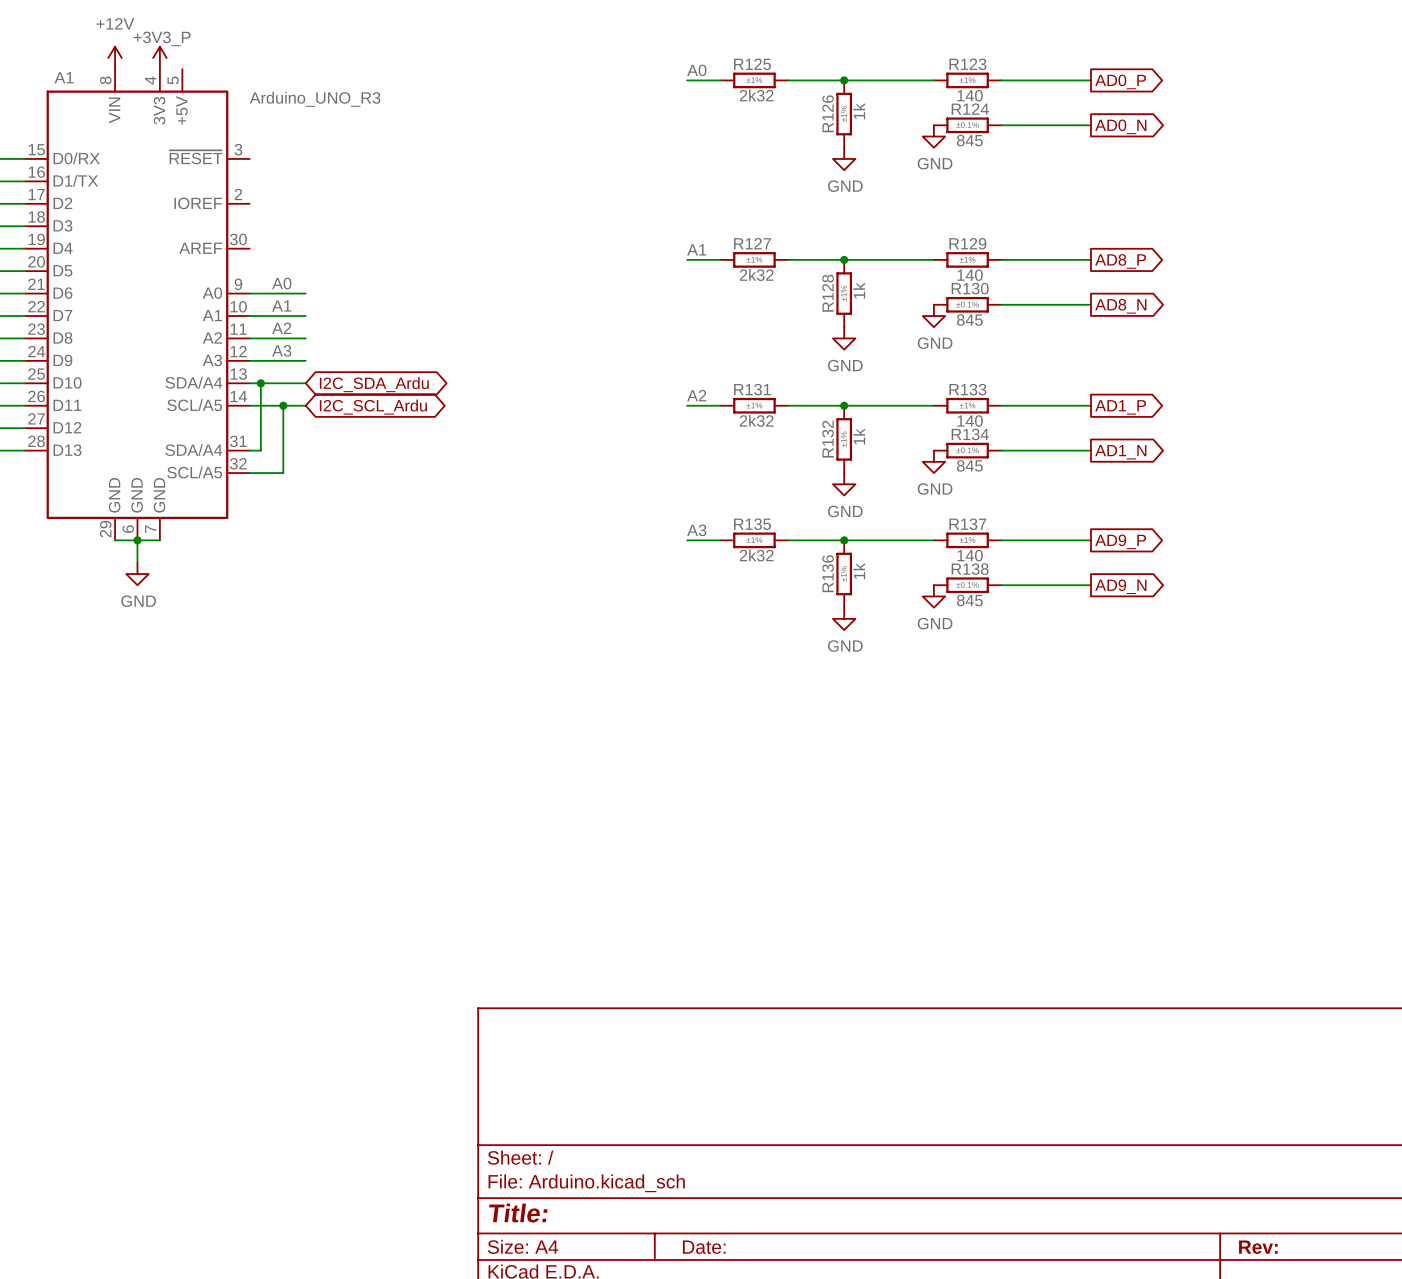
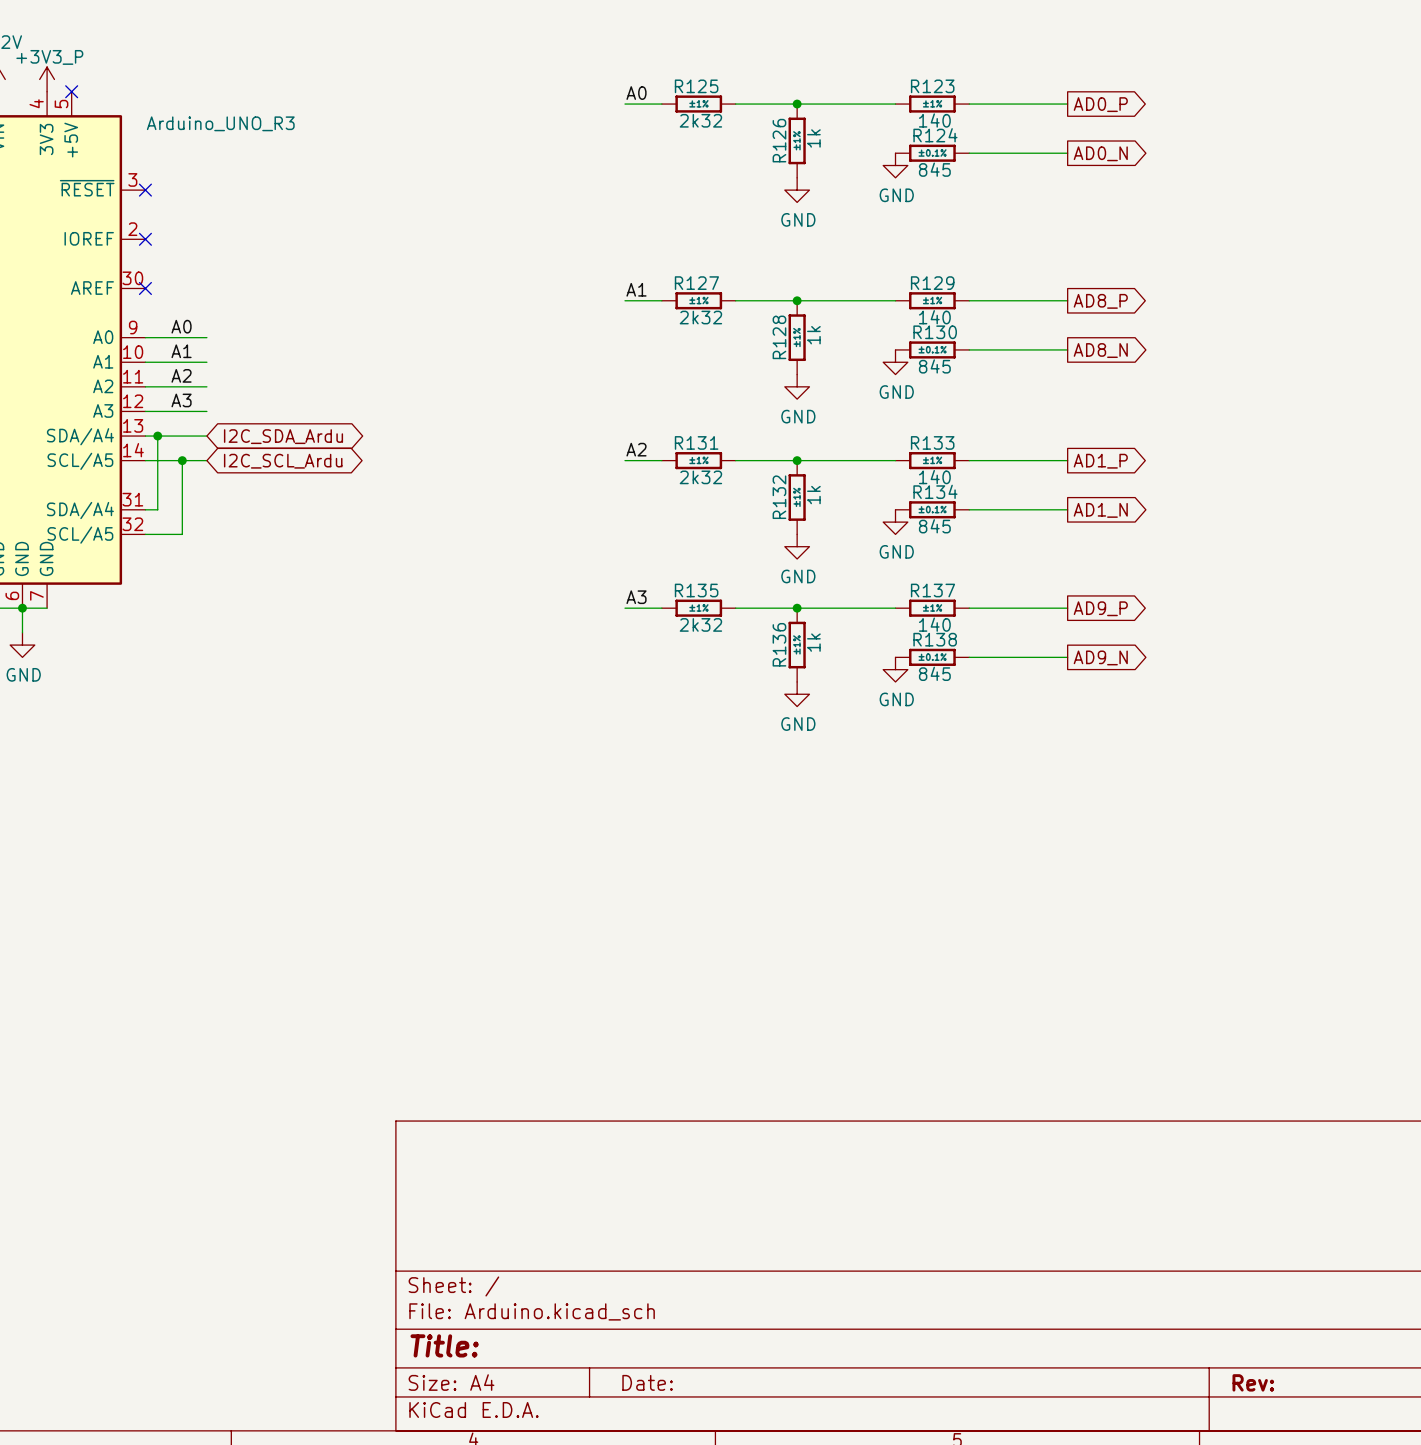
no-connect mark: none -> (71, 91)
no-connect mark: none -> (145, 190)
no-connect mark: none -> (145, 239)
no-connect mark: none -> (145, 288)

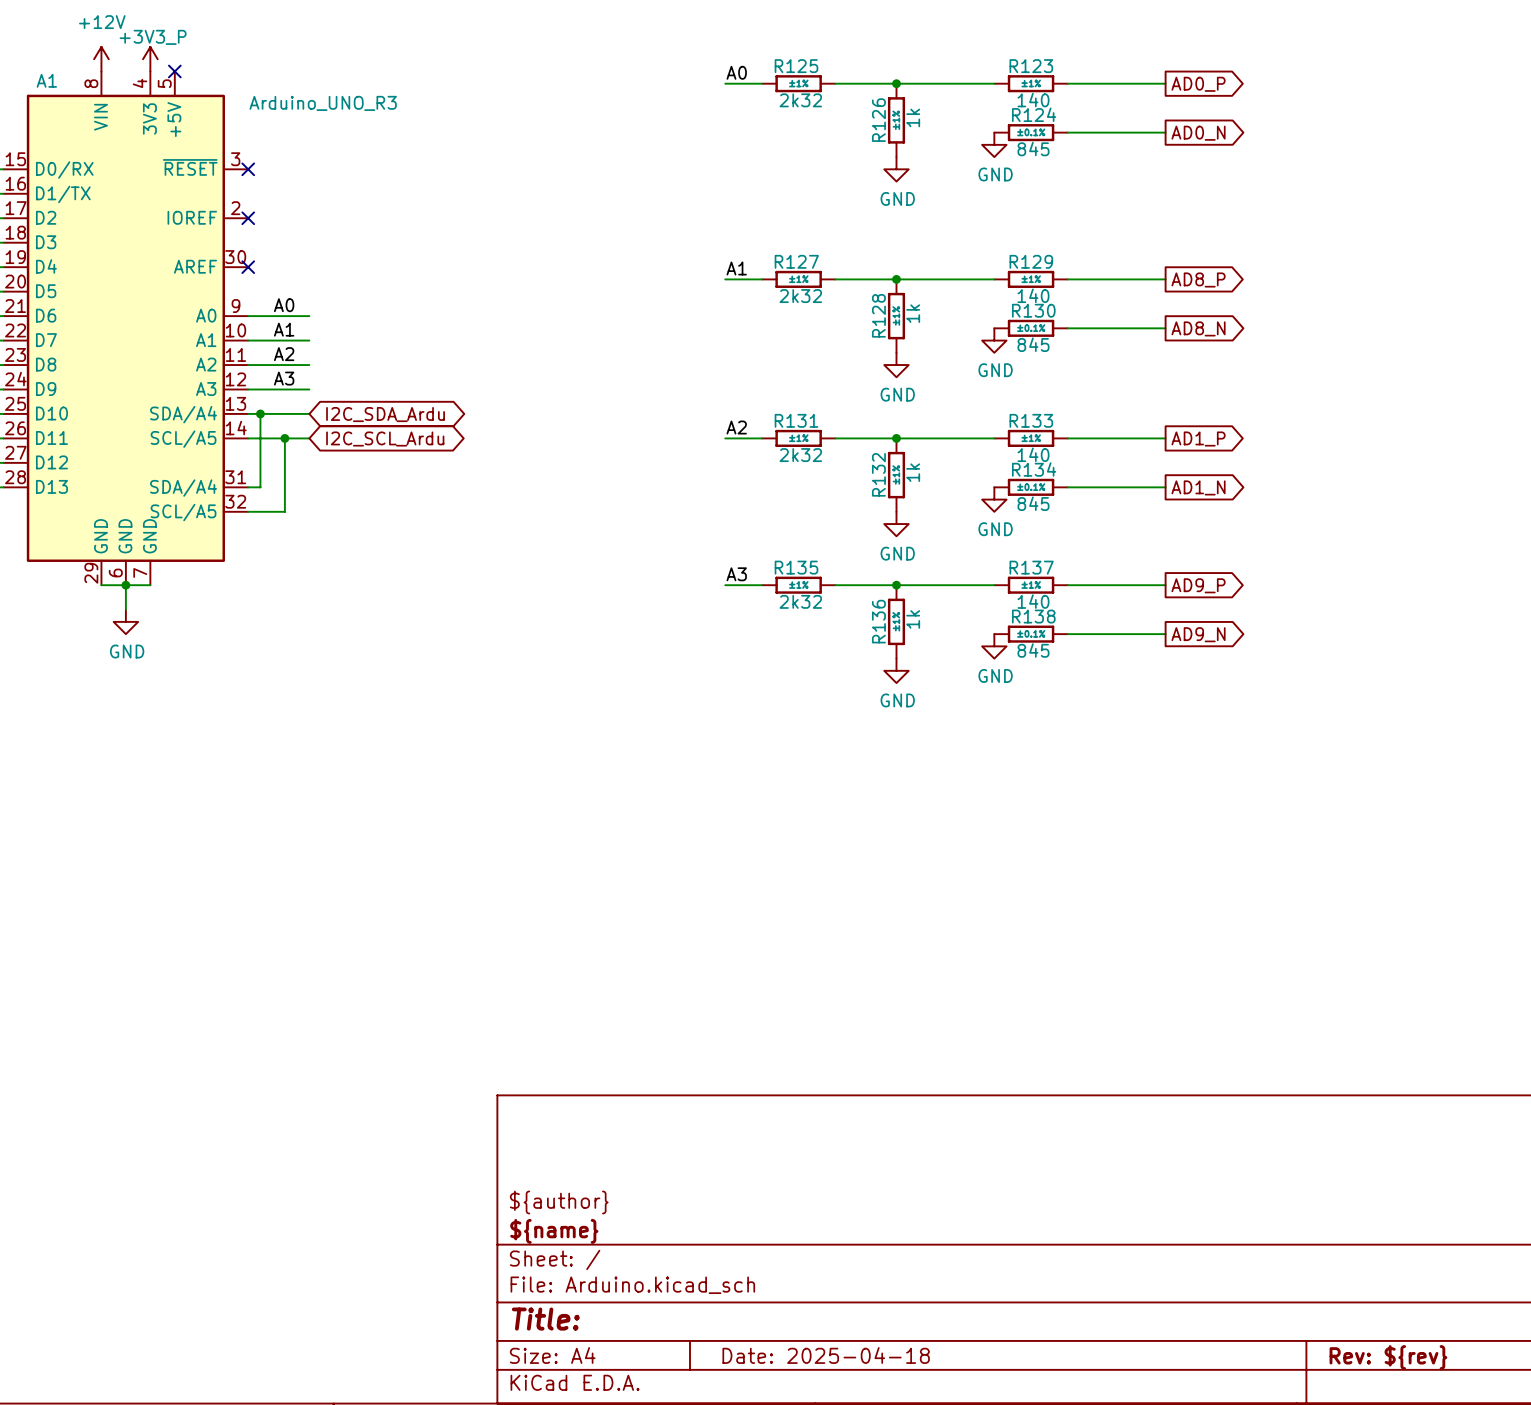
title block: none -> ${author} (559, 1202)
title block: none -> ${name} (554, 1231)
title block: Date: (647, 1382) -> Date: 2025-04-18 (826, 1355)
title block: Rev: (1253, 1382) -> Rev: ${rev} (1388, 1357)

